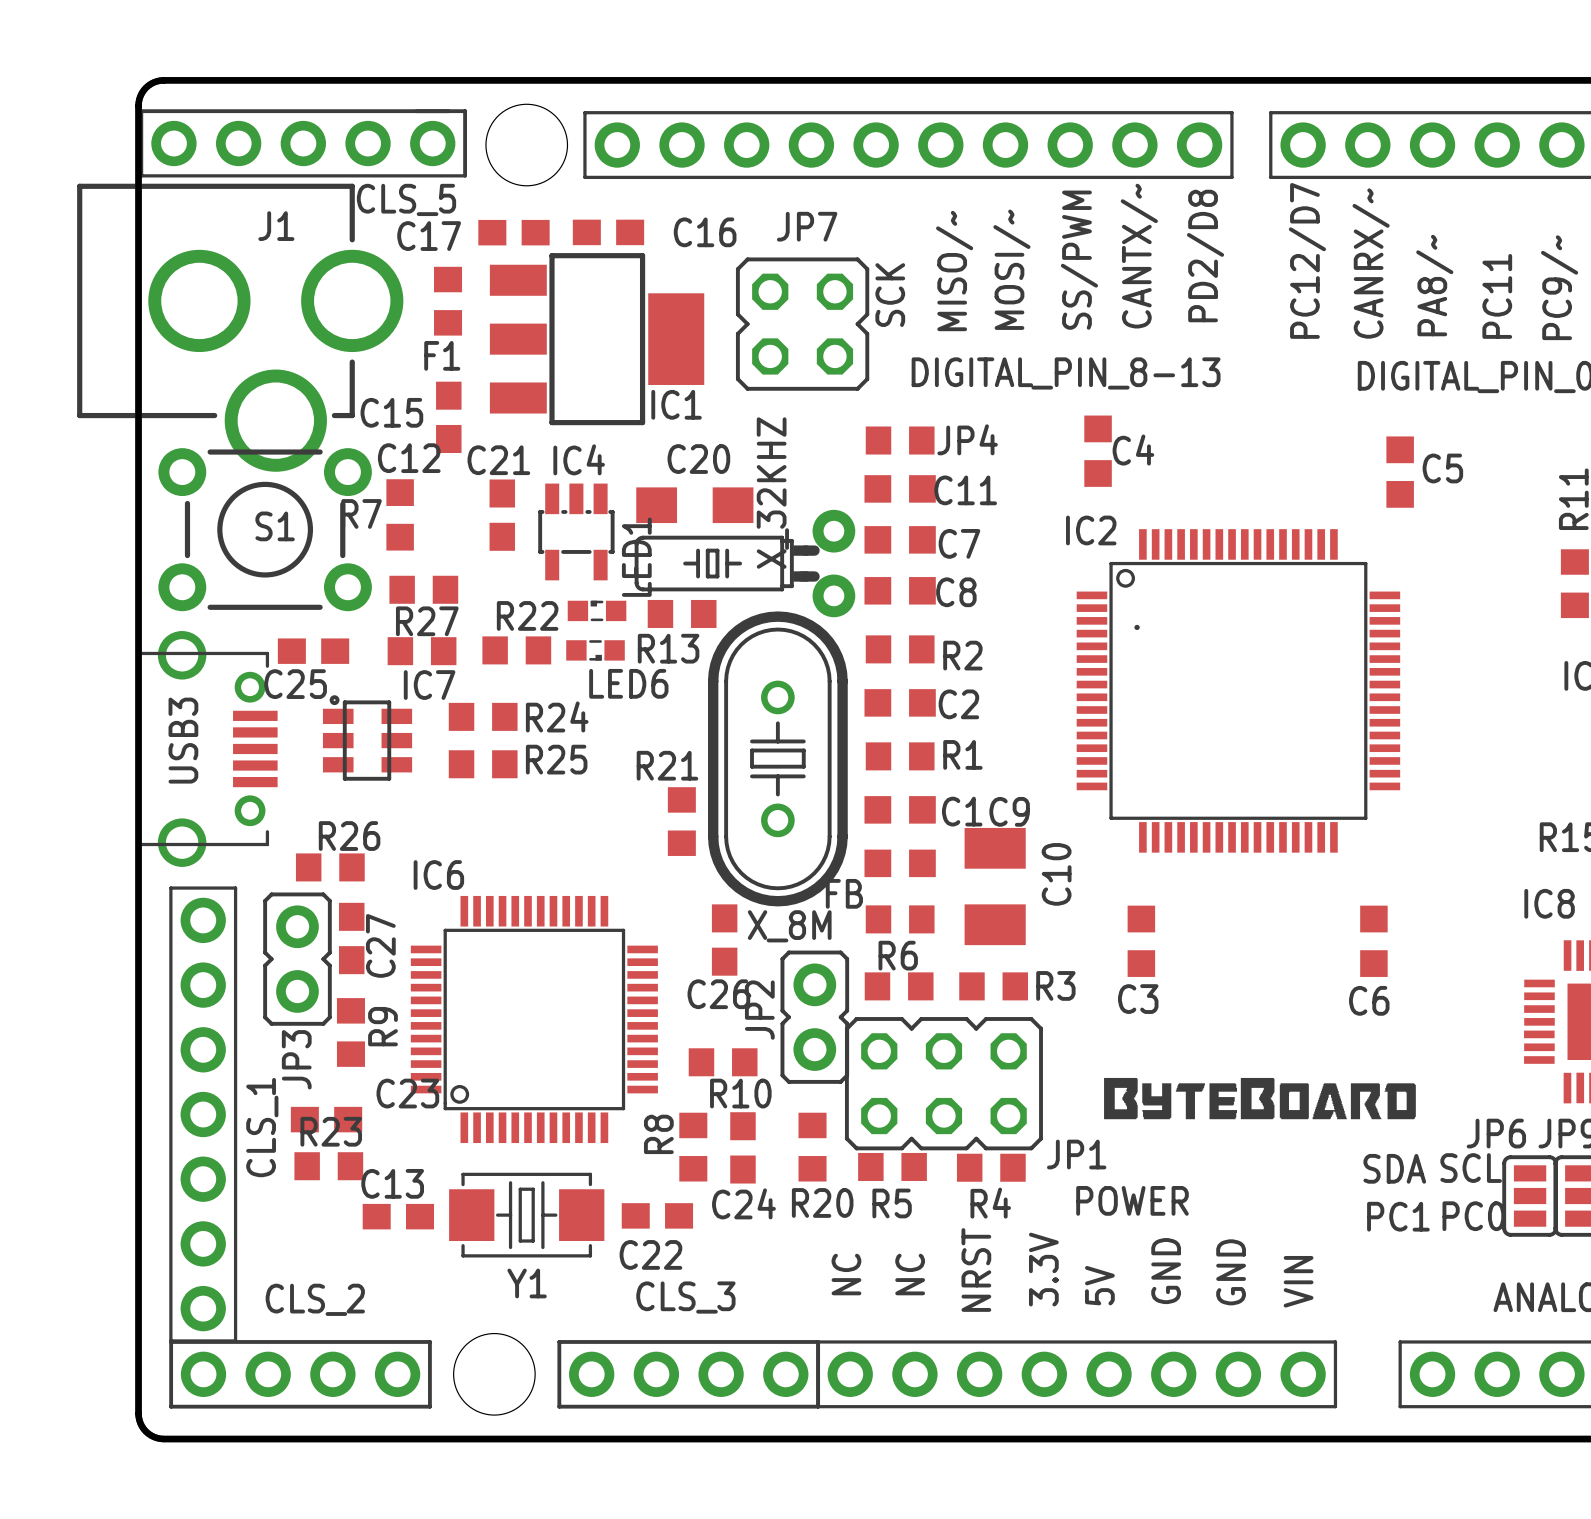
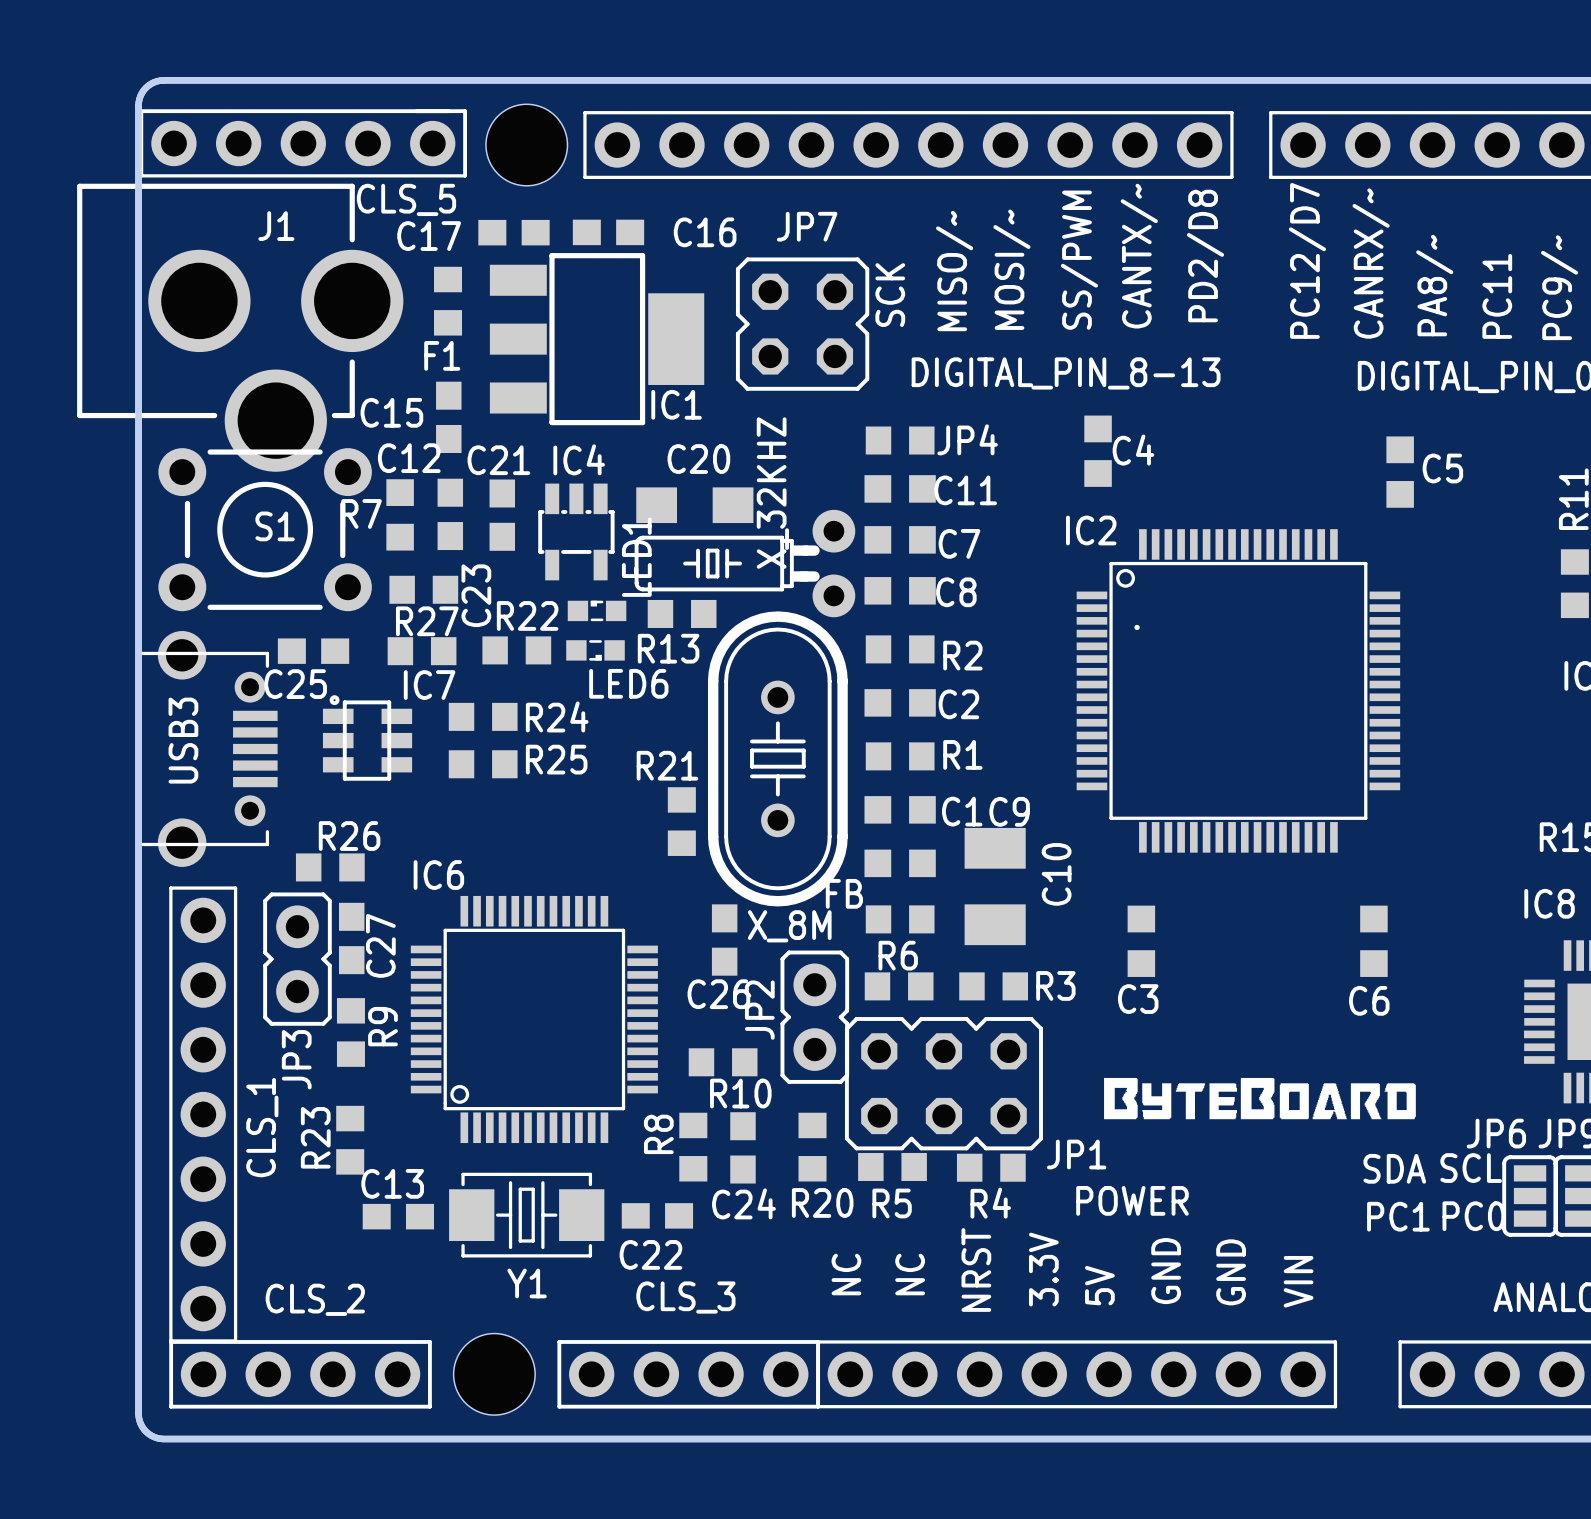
C23 rotation: 0° (326, 1119) -> 90° clockwise (450, 514)
C23 position: (326, 1119) -> (450, 514)
R23 rotation: 0° (328, 1166) -> 90° clockwise (350, 1140)

